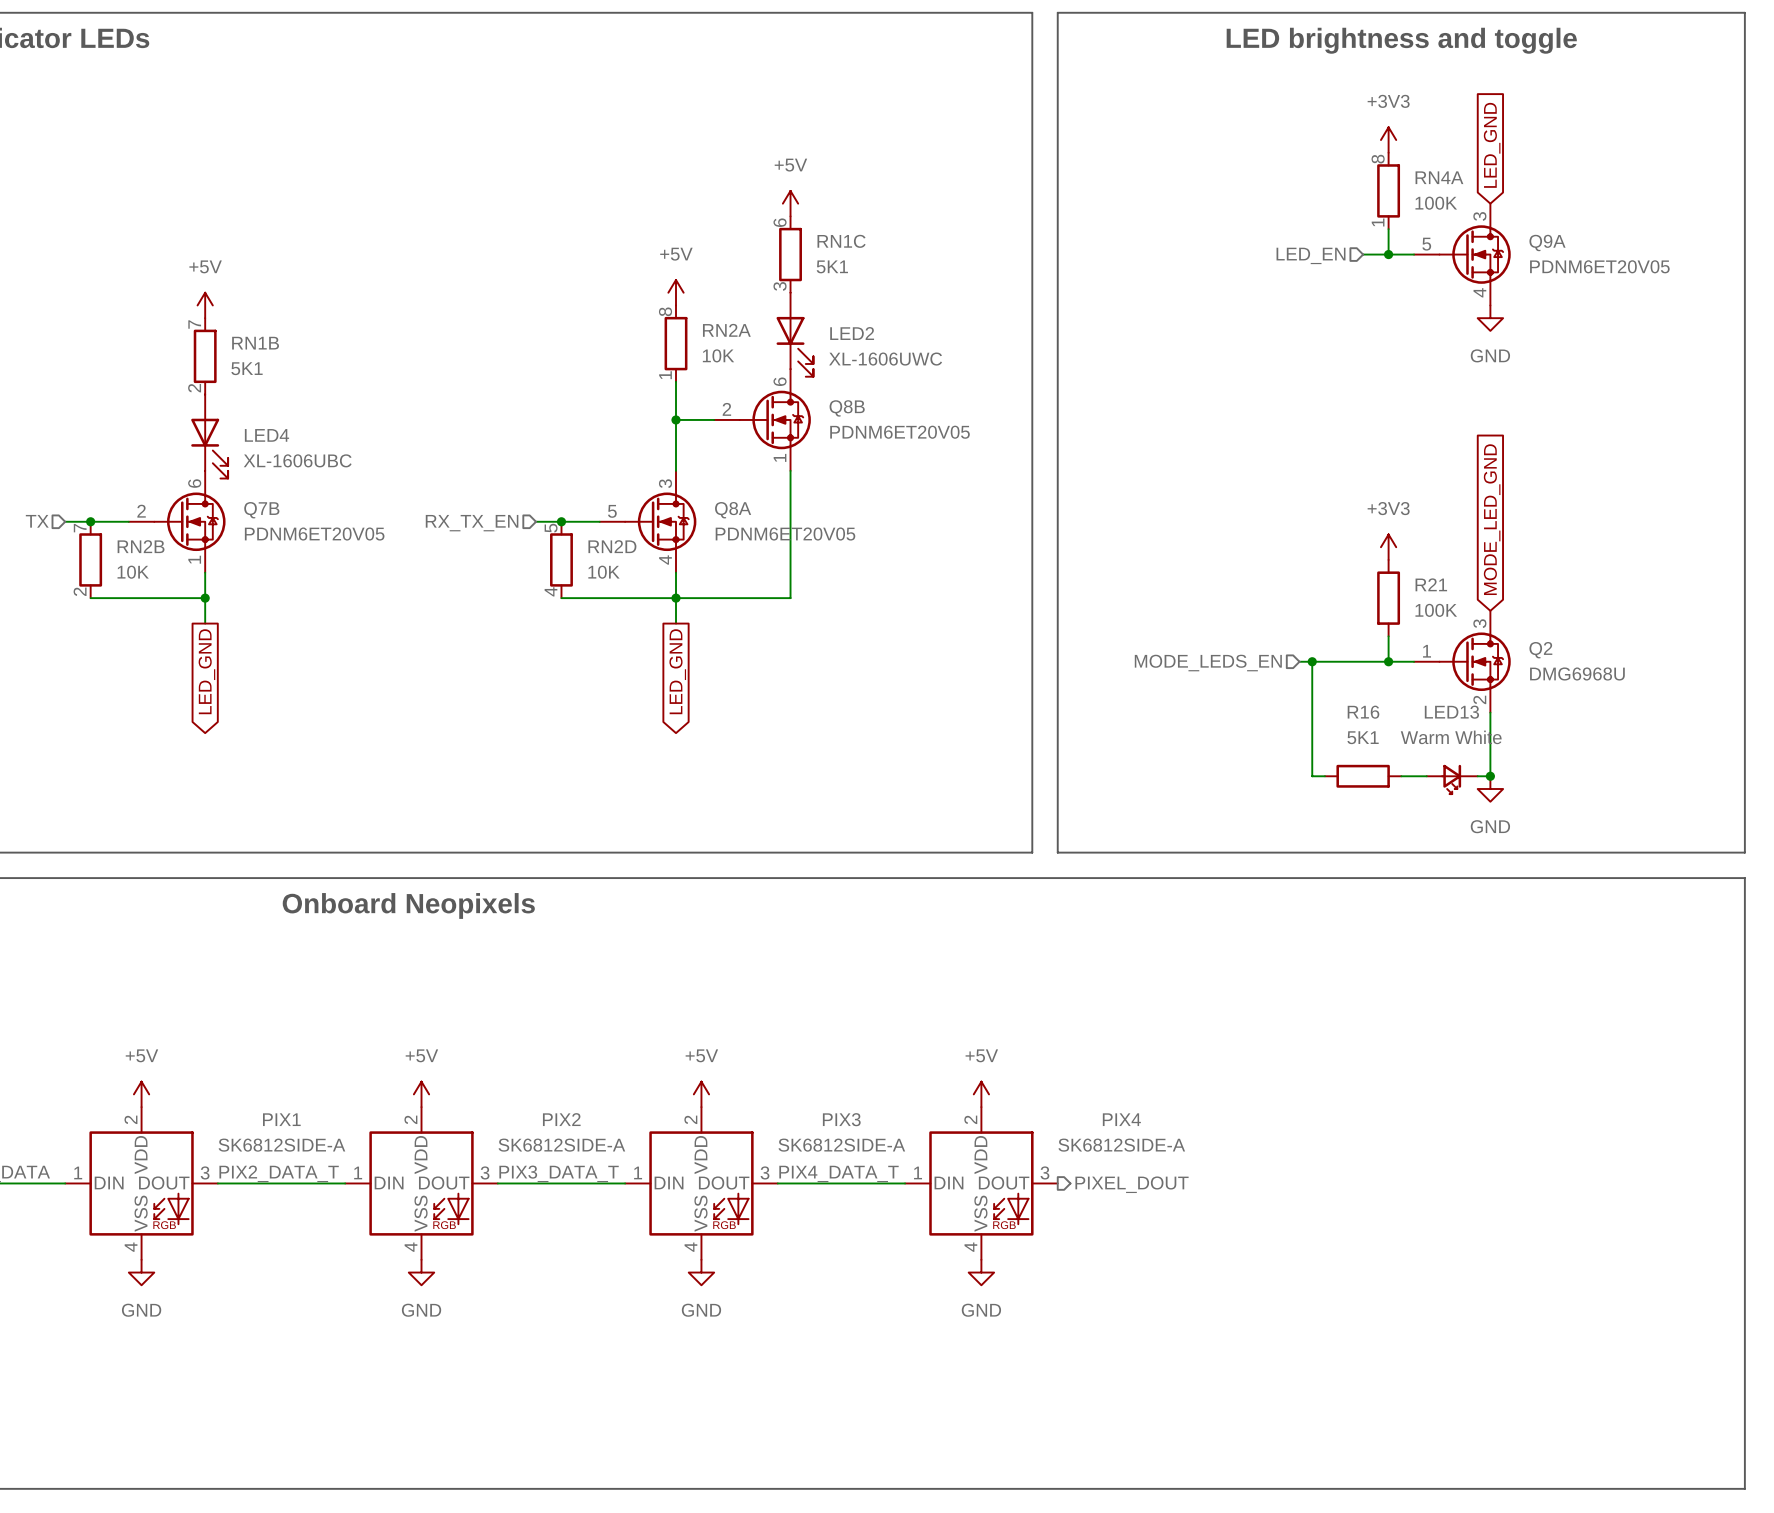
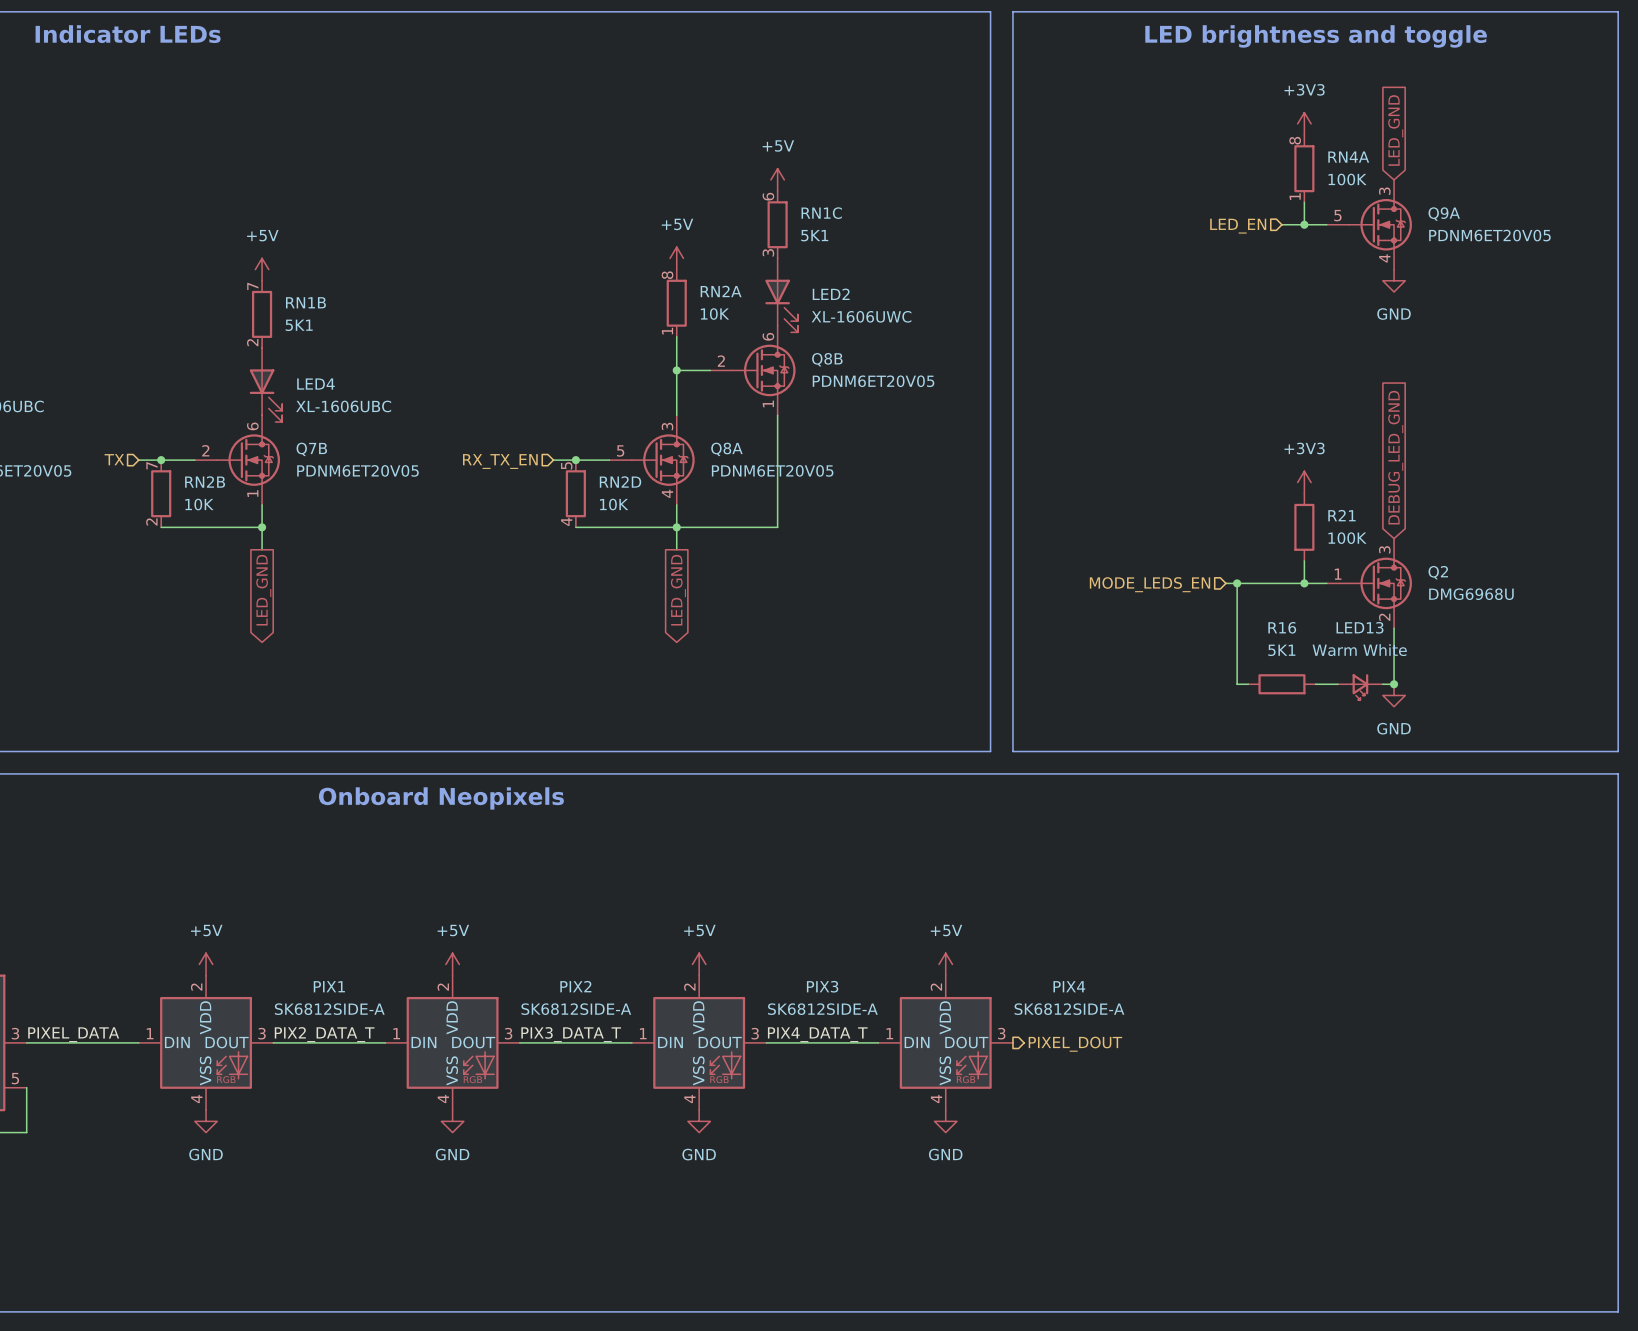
global label: MODE_LED_GND (1492, 519) -> DEBUG_LED_GND (1395, 457)

